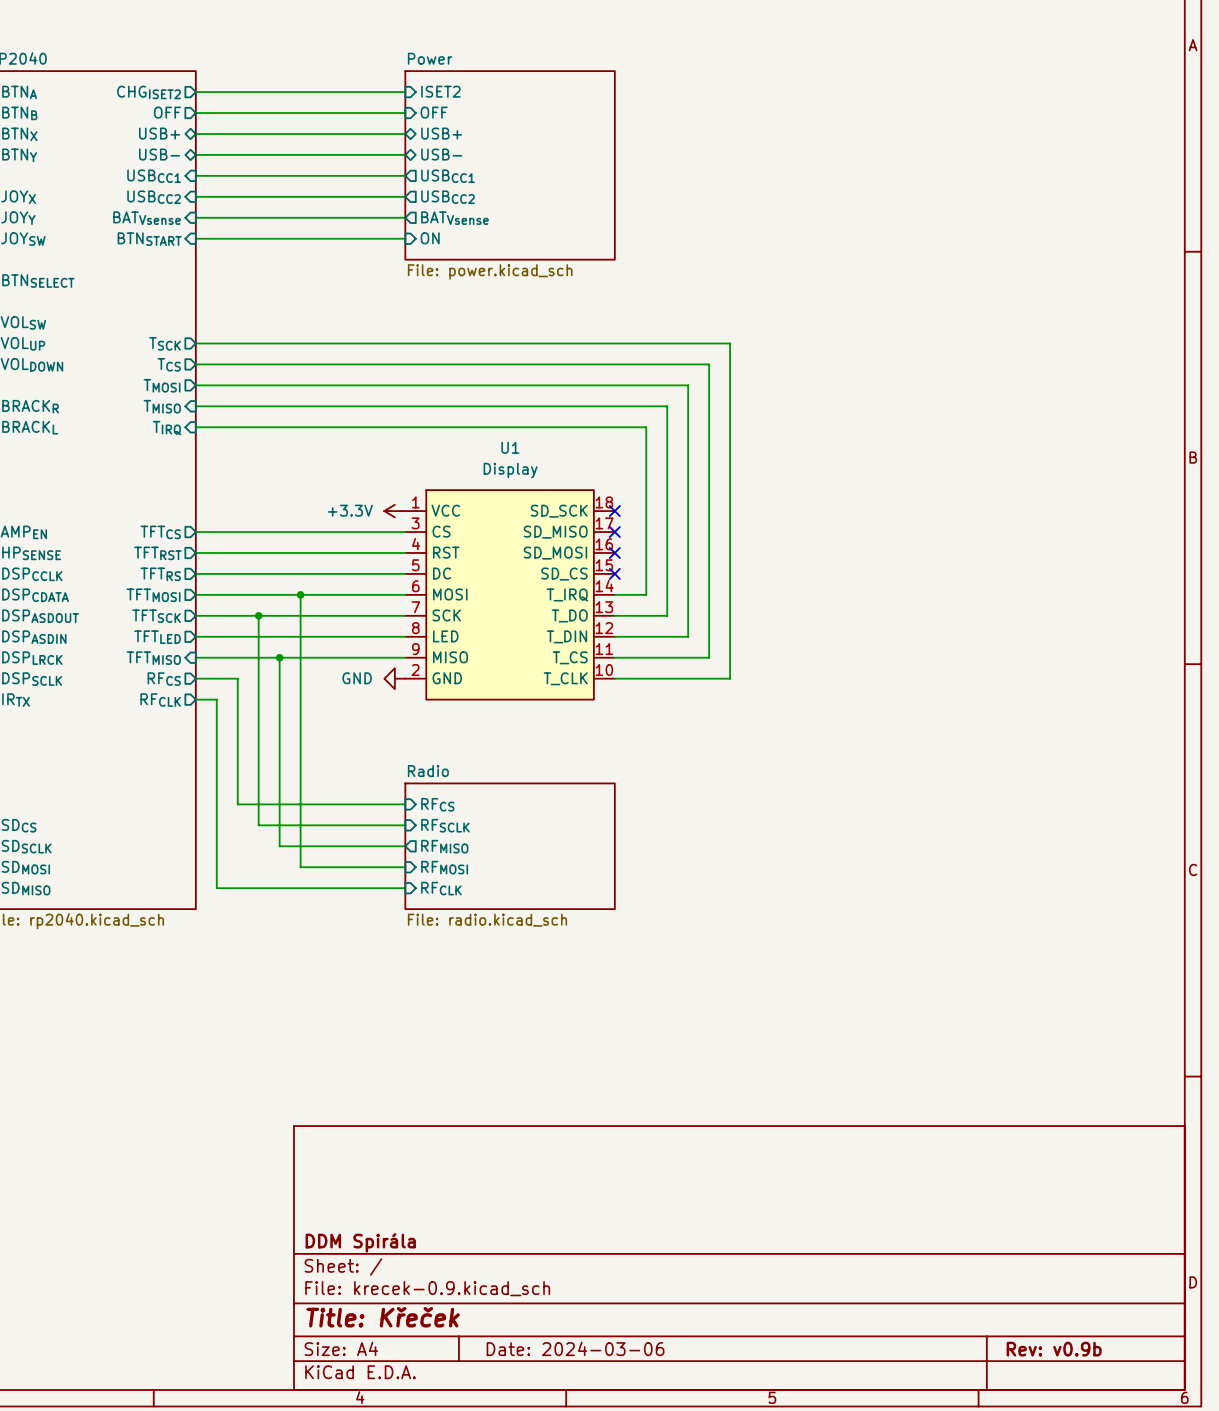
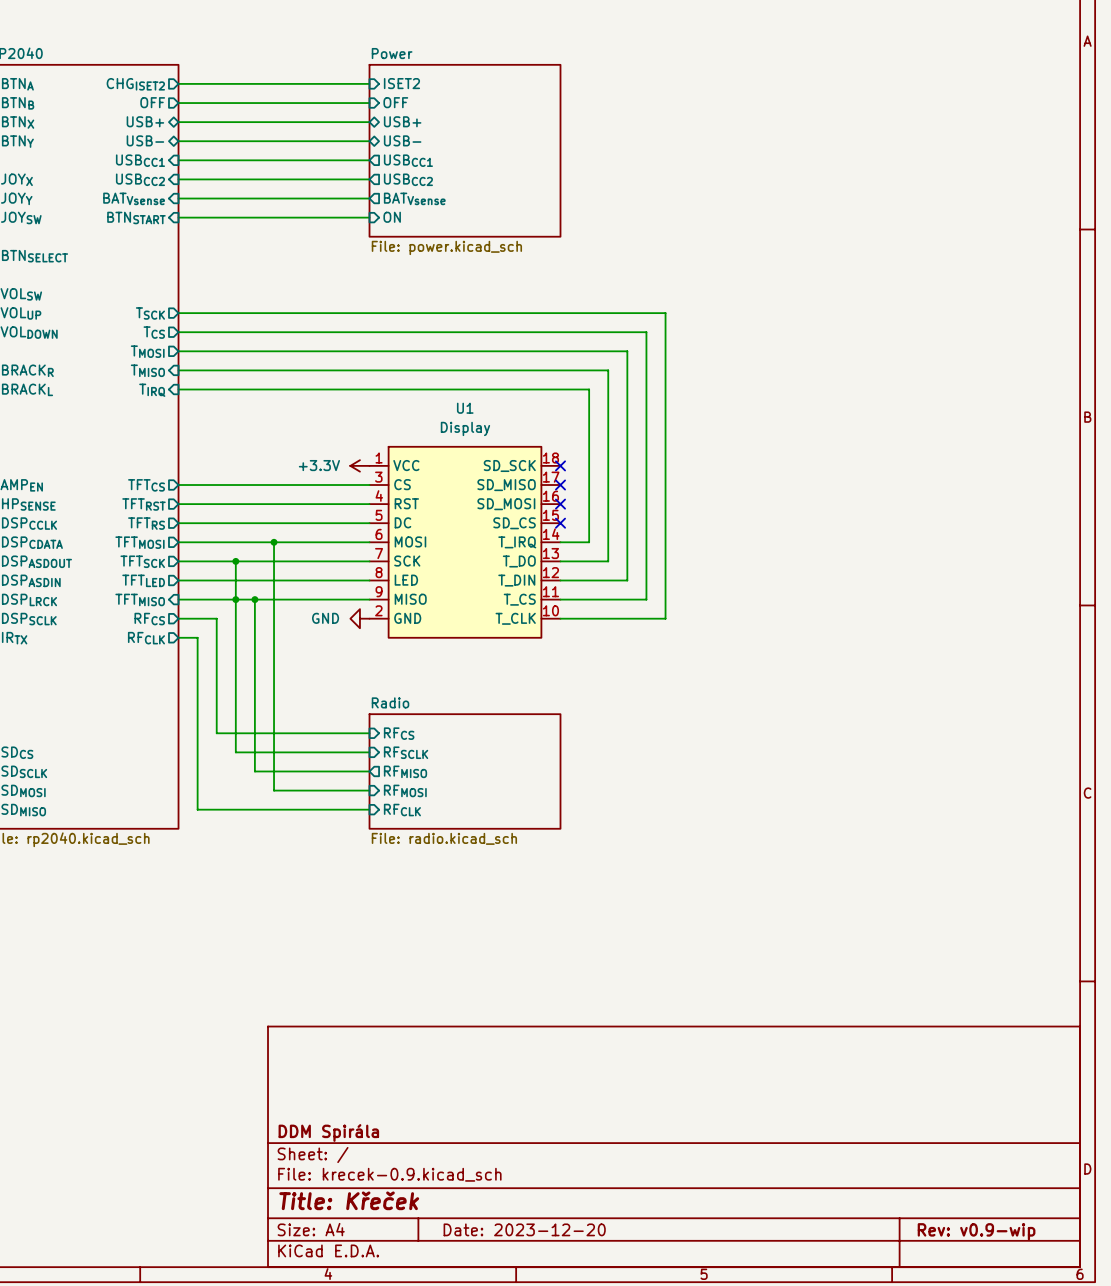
junction: none -> (235, 599)
title block: Date: 2024-03-06 (575, 1348) -> Date: 2023-12-20 (524, 1229)
title block: Rev: v0.9b (1054, 1349) -> Rev: v0.9-wip (976, 1231)

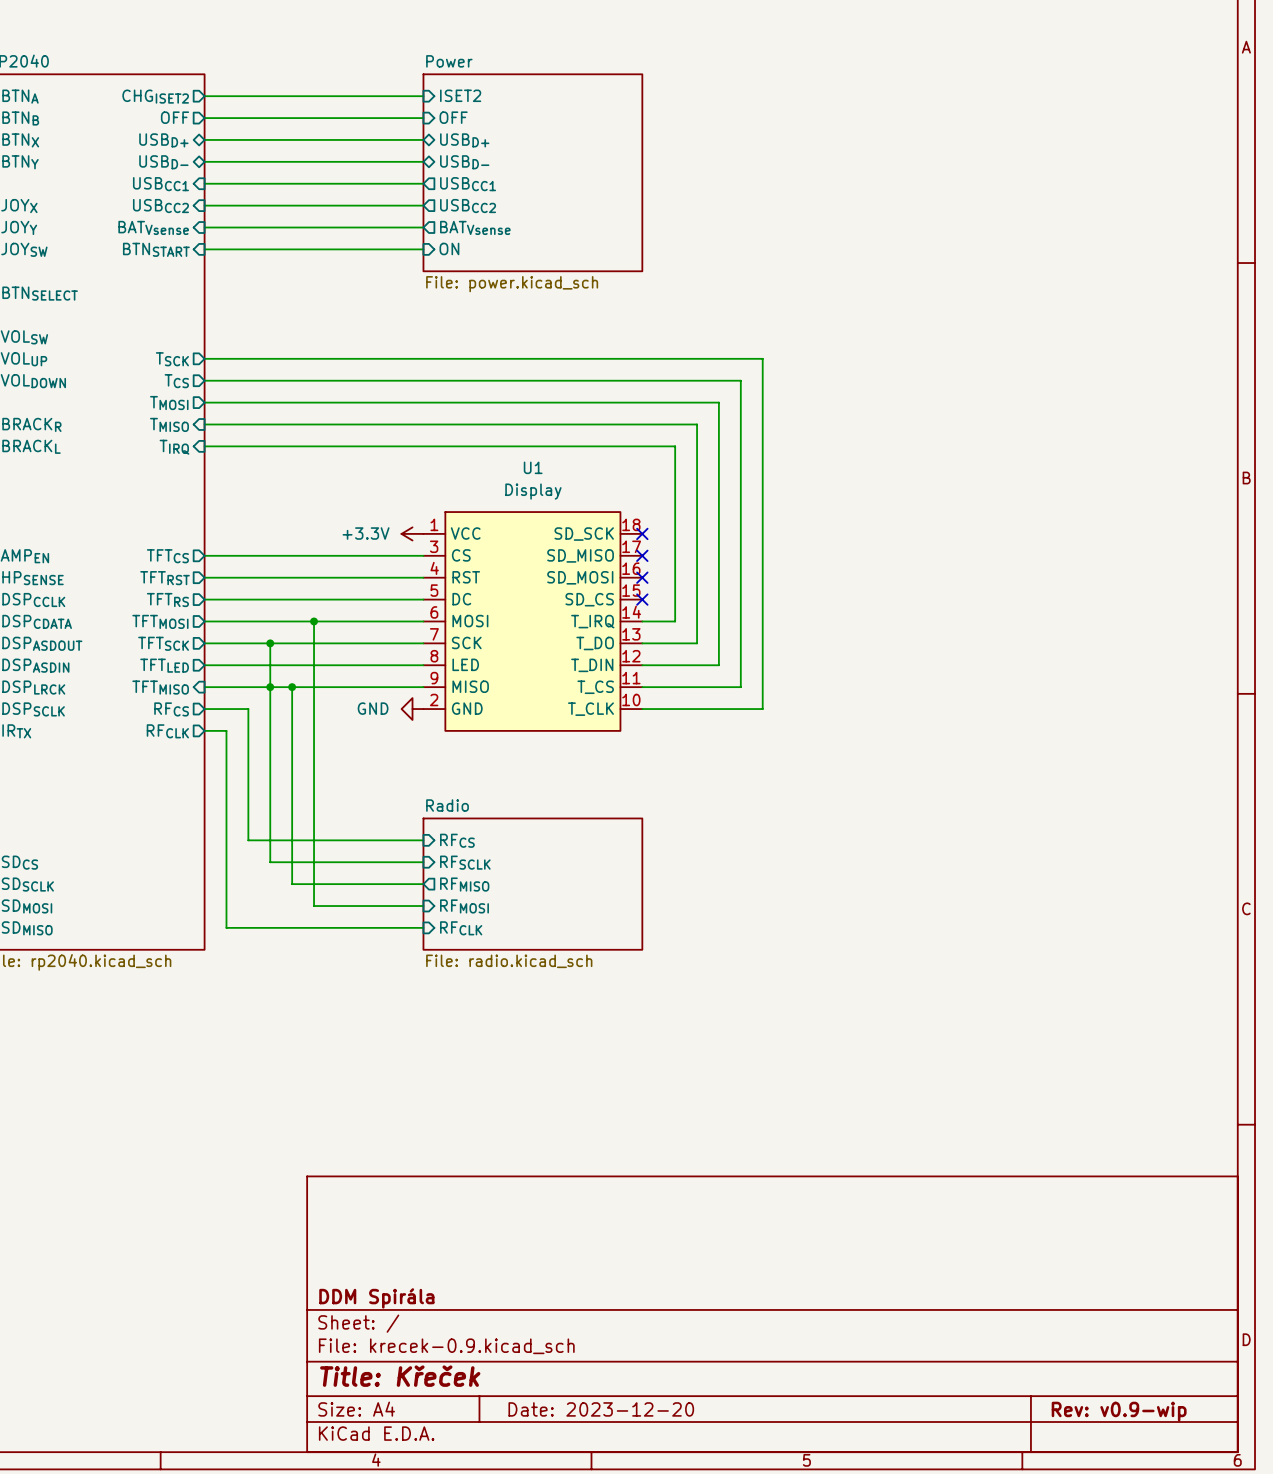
sheet pin: USB+ (145, 121) -> USBD+ (163, 140)
sheet pin: USB+ (402, 121) -> USBD+ (464, 140)
sheet pin: USB- (145, 140) -> USBD- (163, 162)
sheet pin: USB- (402, 140) -> USBD- (464, 162)

